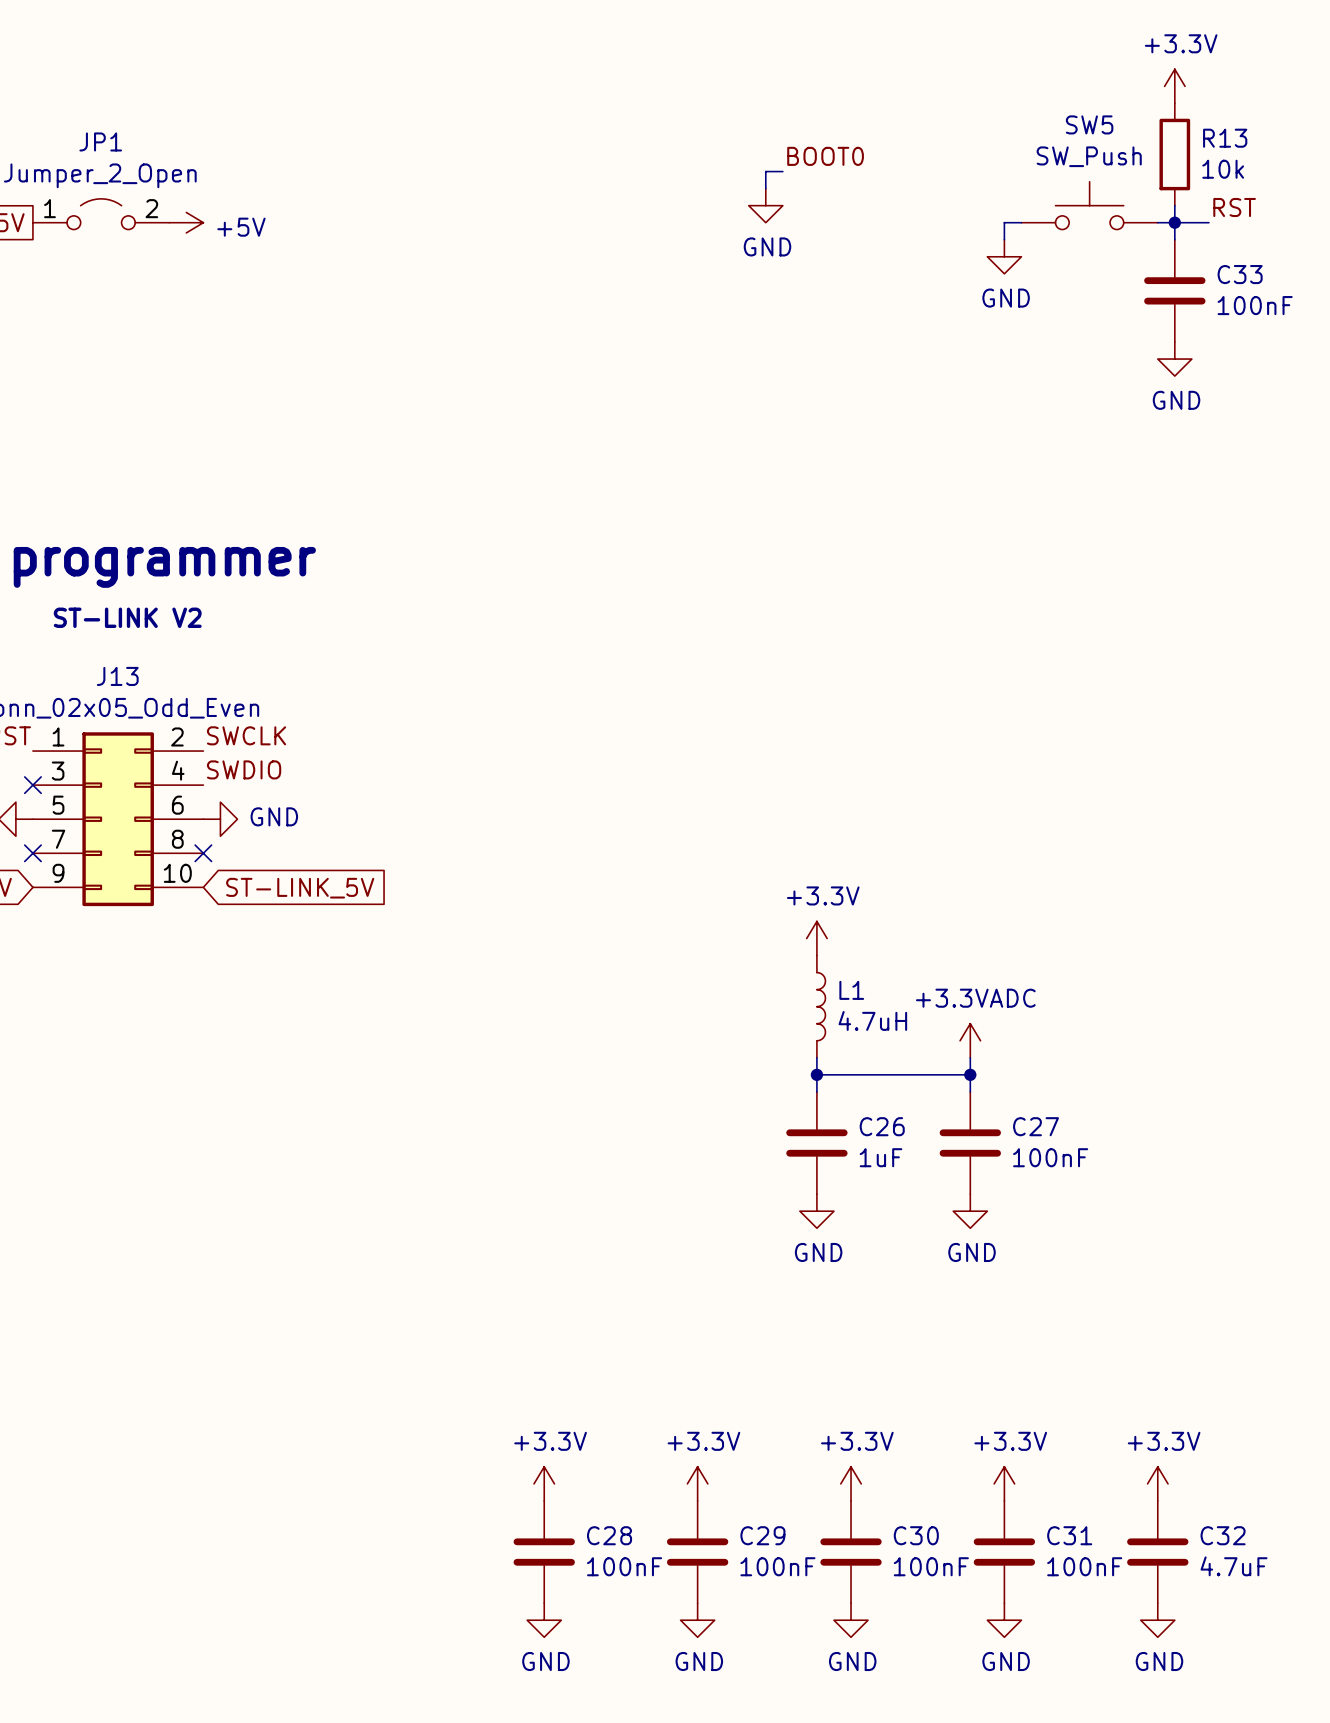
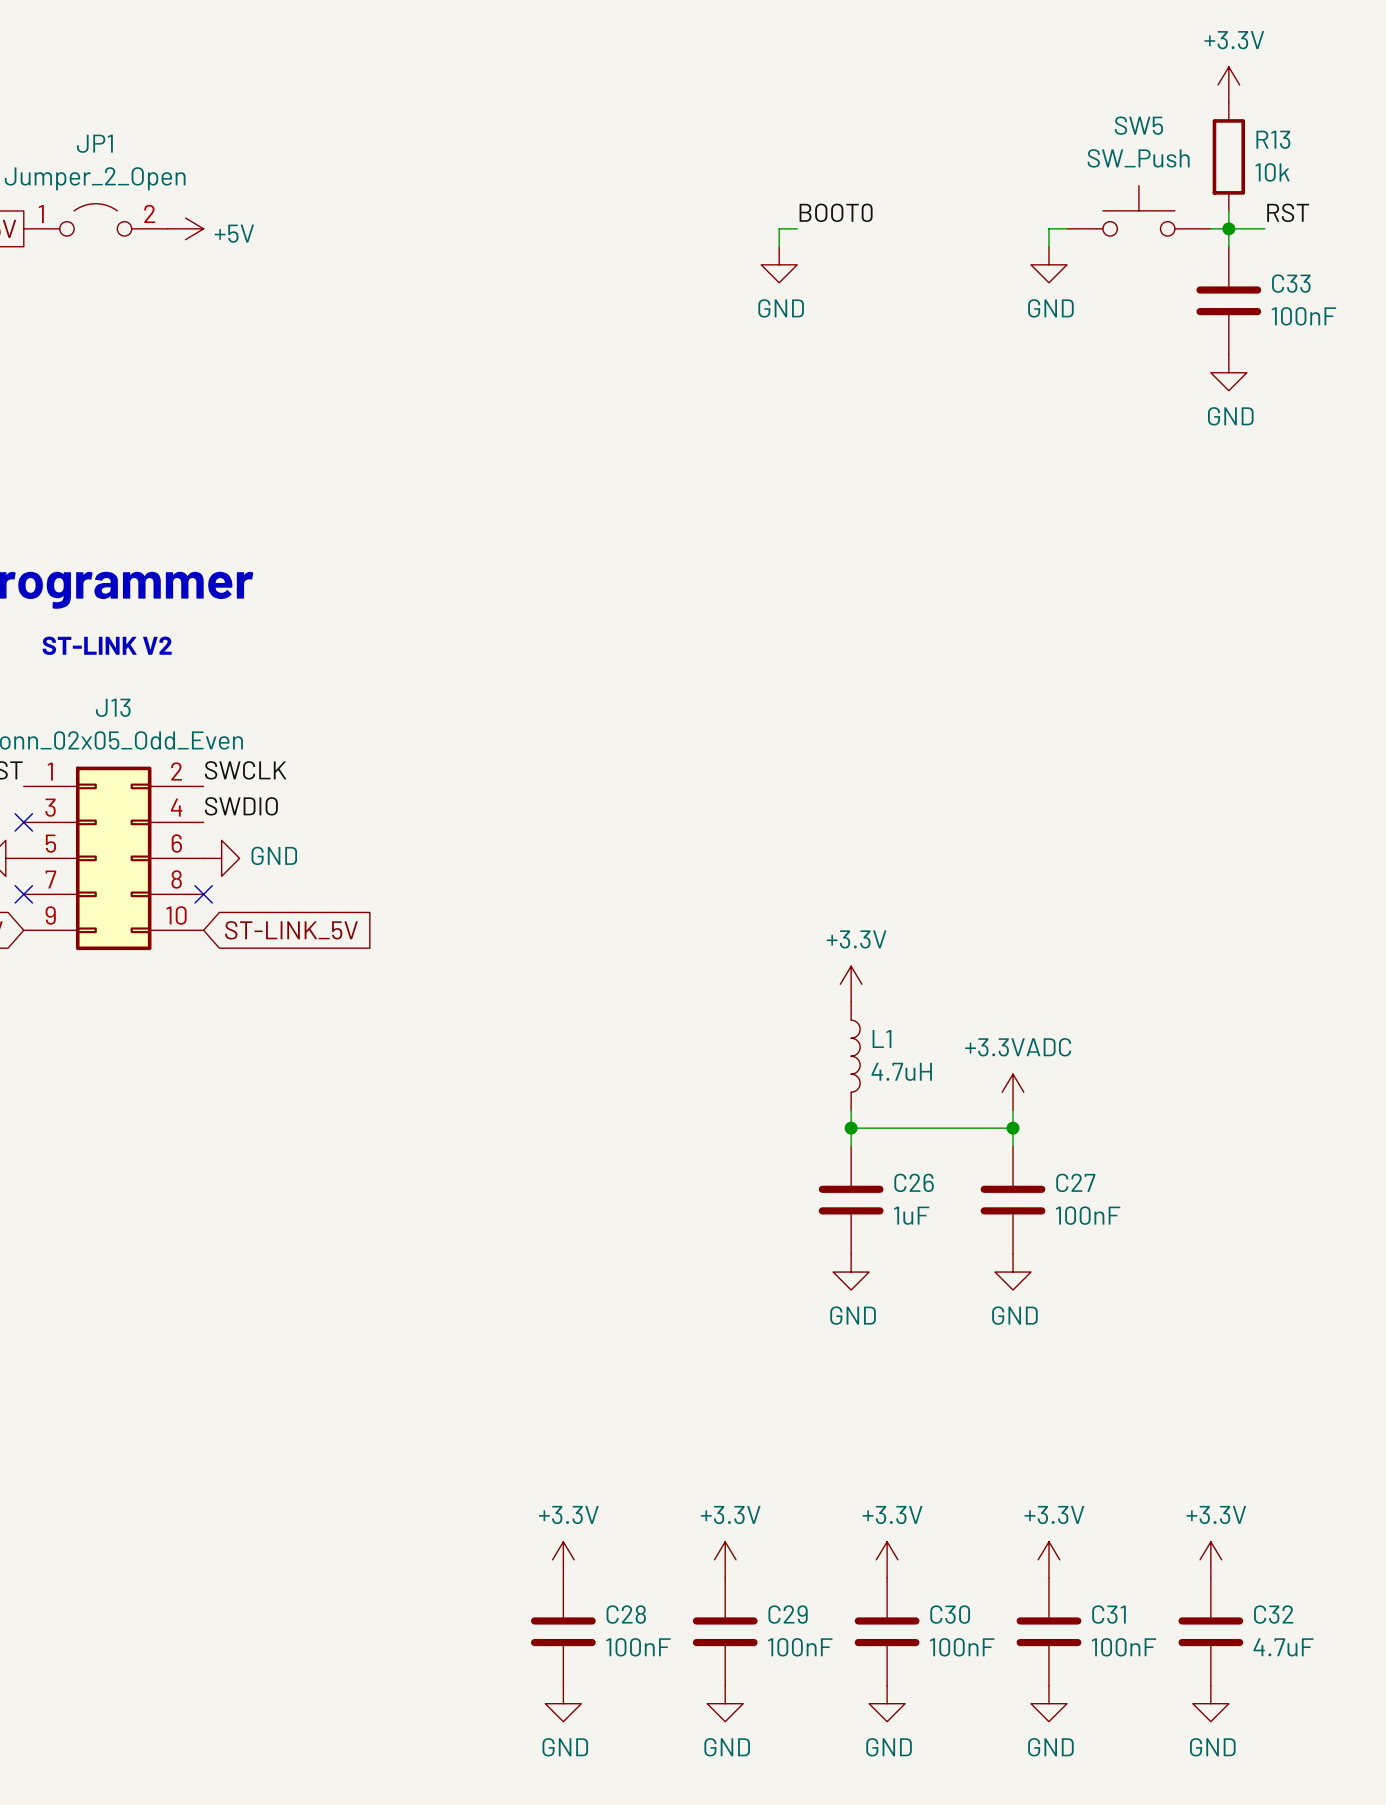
label position: BOOT0 (825, 156) -> BOOT0 (836, 212)
wire: (782, 171) (765, 171) (765, 188) -> (797, 228) (779, 228) (779, 246)
power symbol position: GND (765, 205) -> GND (779, 264)

